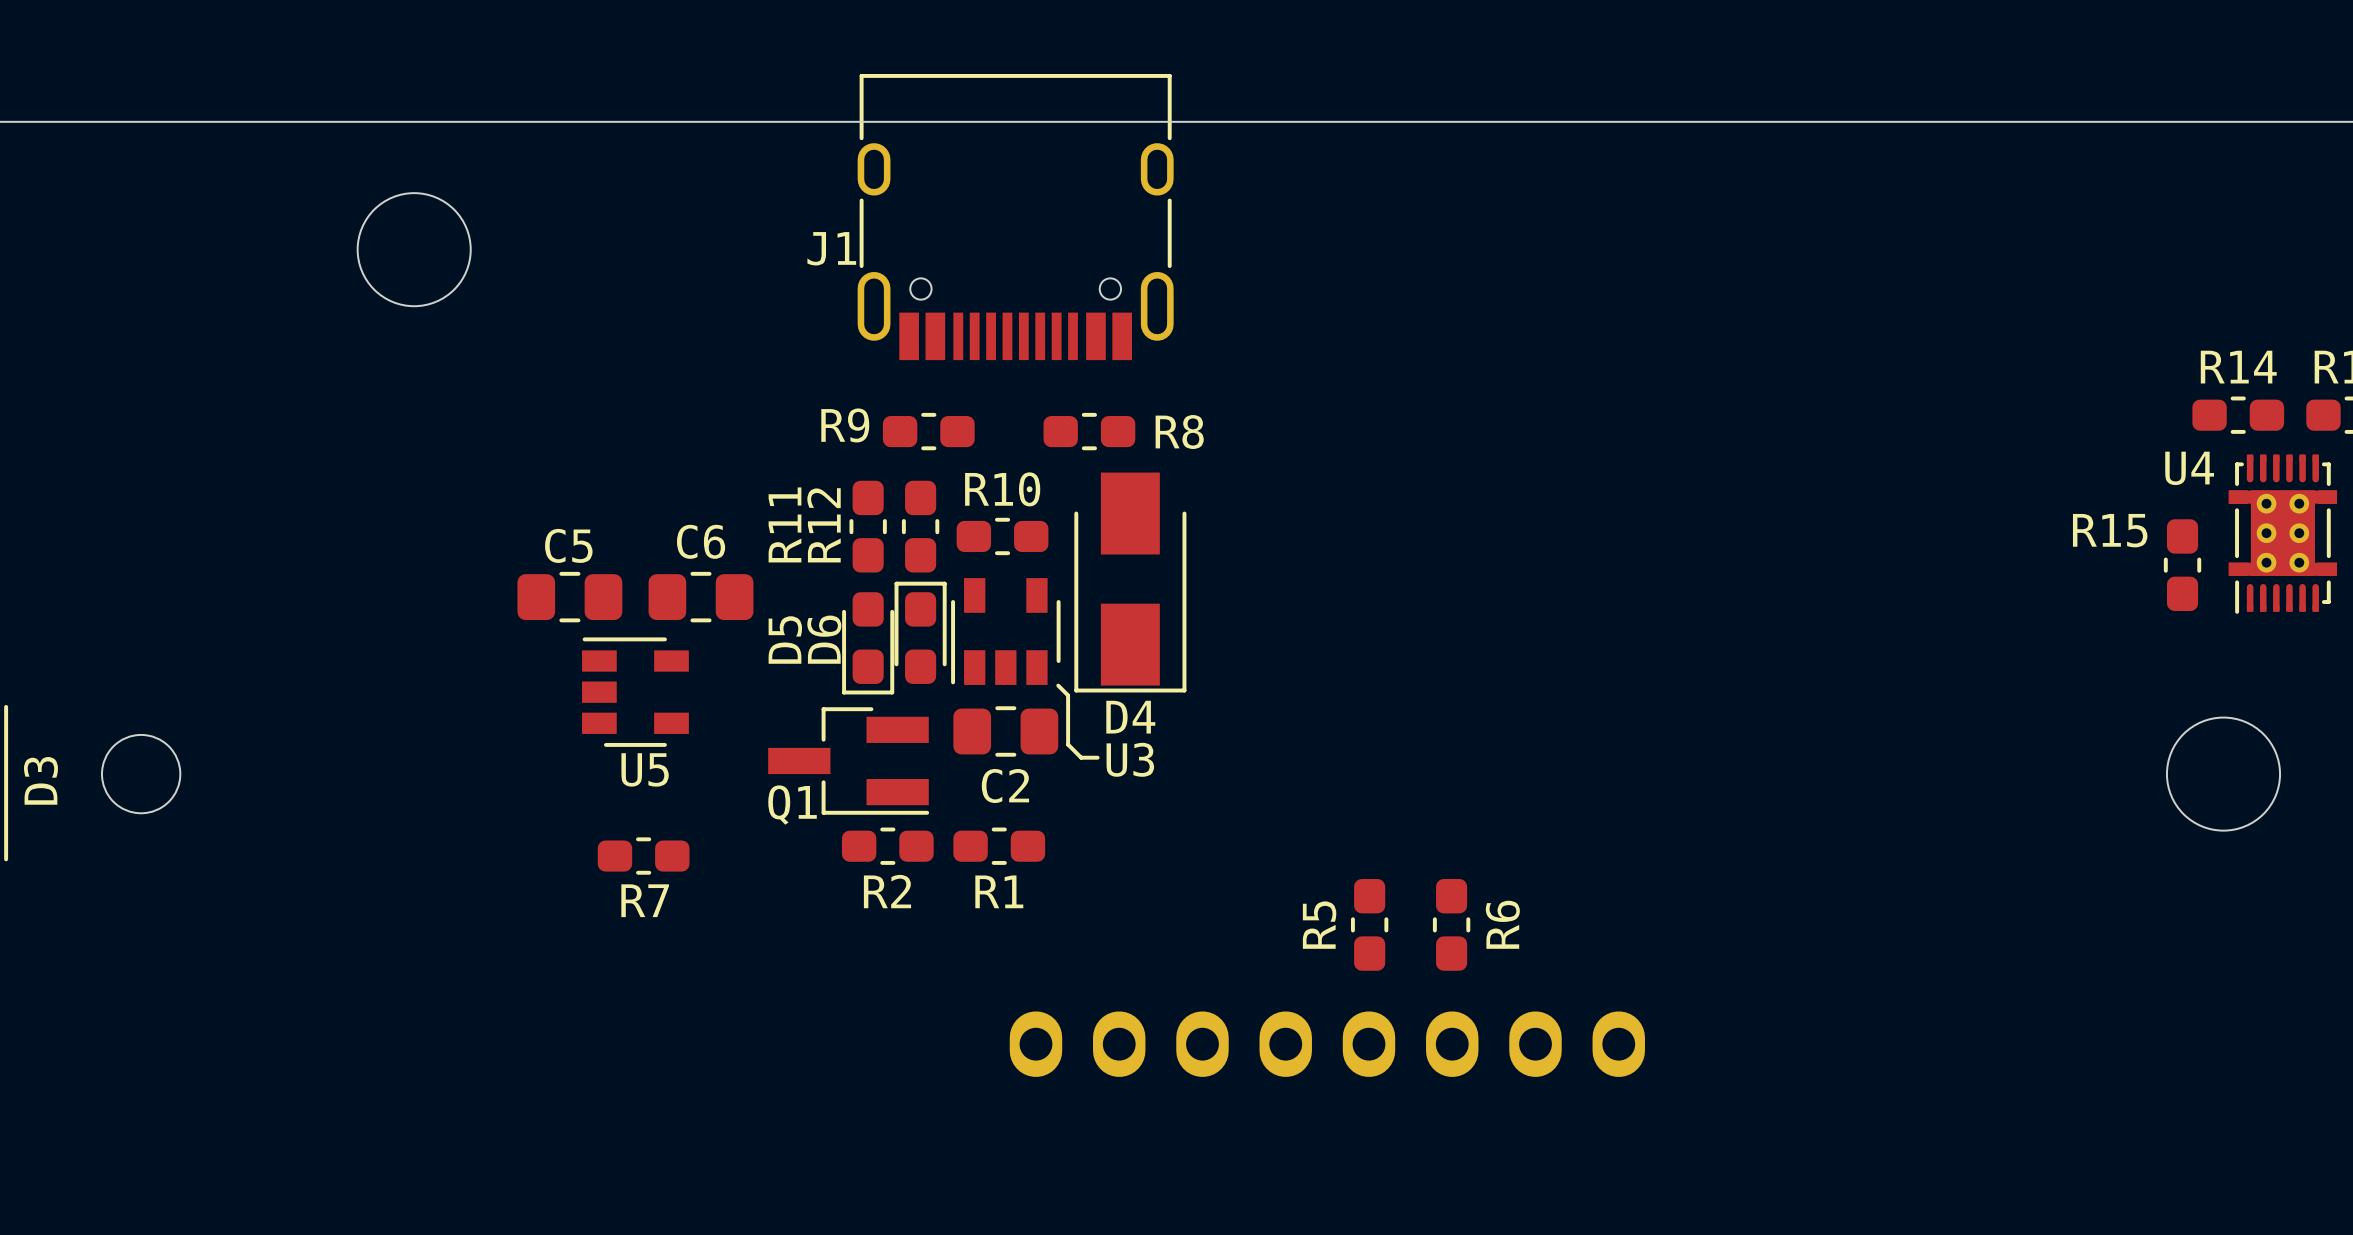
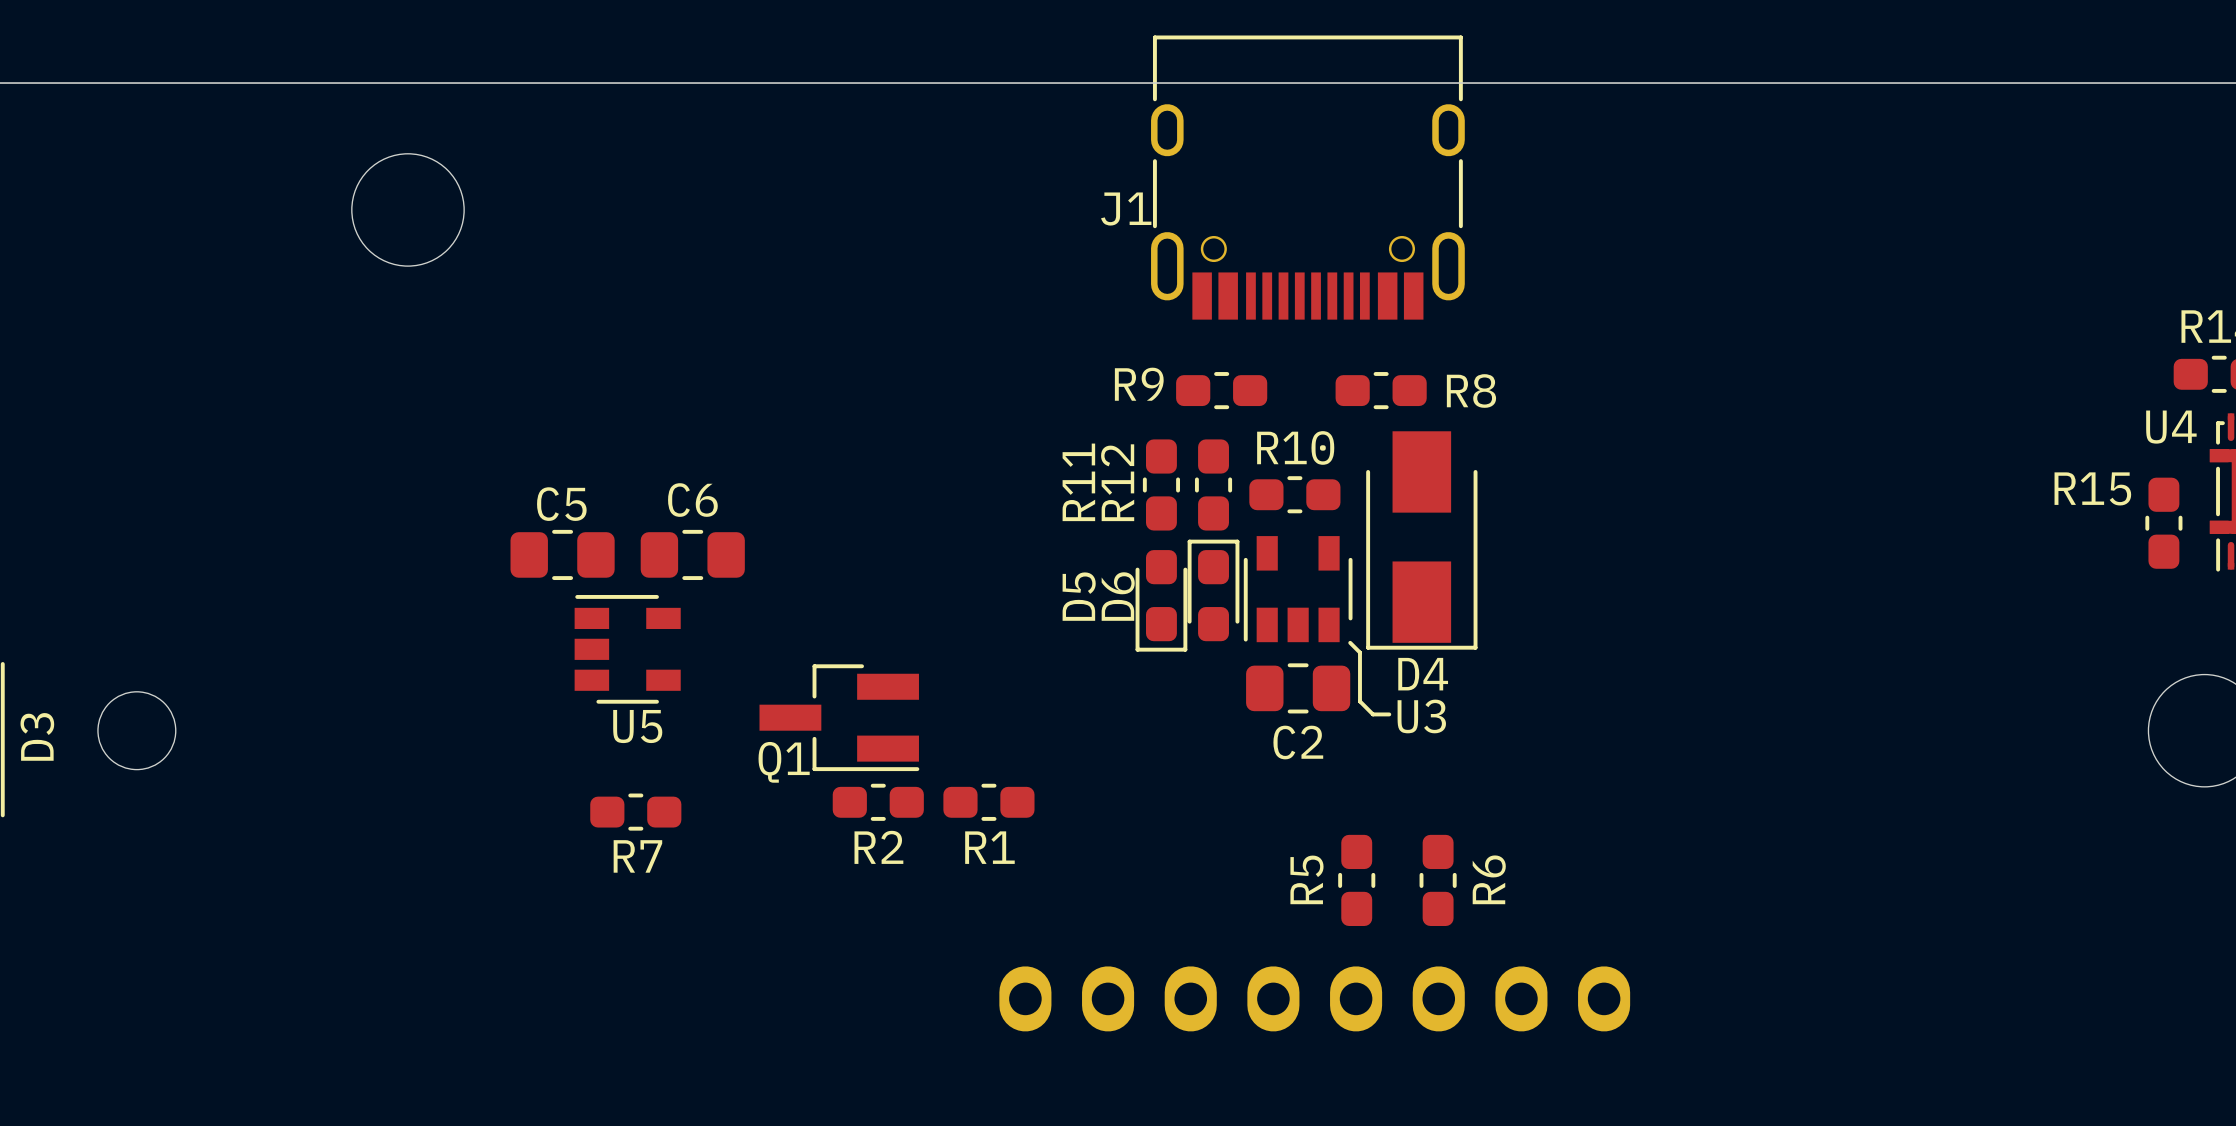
J1 footprint: [857, 73, 1174, 361] -> [1151, 35, 1465, 320]
R9 position: (928, 431) -> (1221, 390)
R8 position: (1089, 431) -> (1381, 390)
R11 position: (868, 526) -> (1161, 484)
R12 position: (920, 526) -> (1213, 484)
R10 position: (1002, 536) -> (1294, 494)
D4 position: (1130, 582) -> (1421, 540)
U3 position: (1005, 631) -> (1298, 589)
D6 position: (920, 632) -> (1213, 590)
D5 position: (868, 643) -> (1161, 600)
line: (1058, 685) (1068, 695) (1068, 744) (1081, 757) (1097, 757) -> (1350, 642) (1359, 652) (1359, 701) (1373, 714) (1389, 714)
C2 position: (1005, 731) -> (1298, 688)

